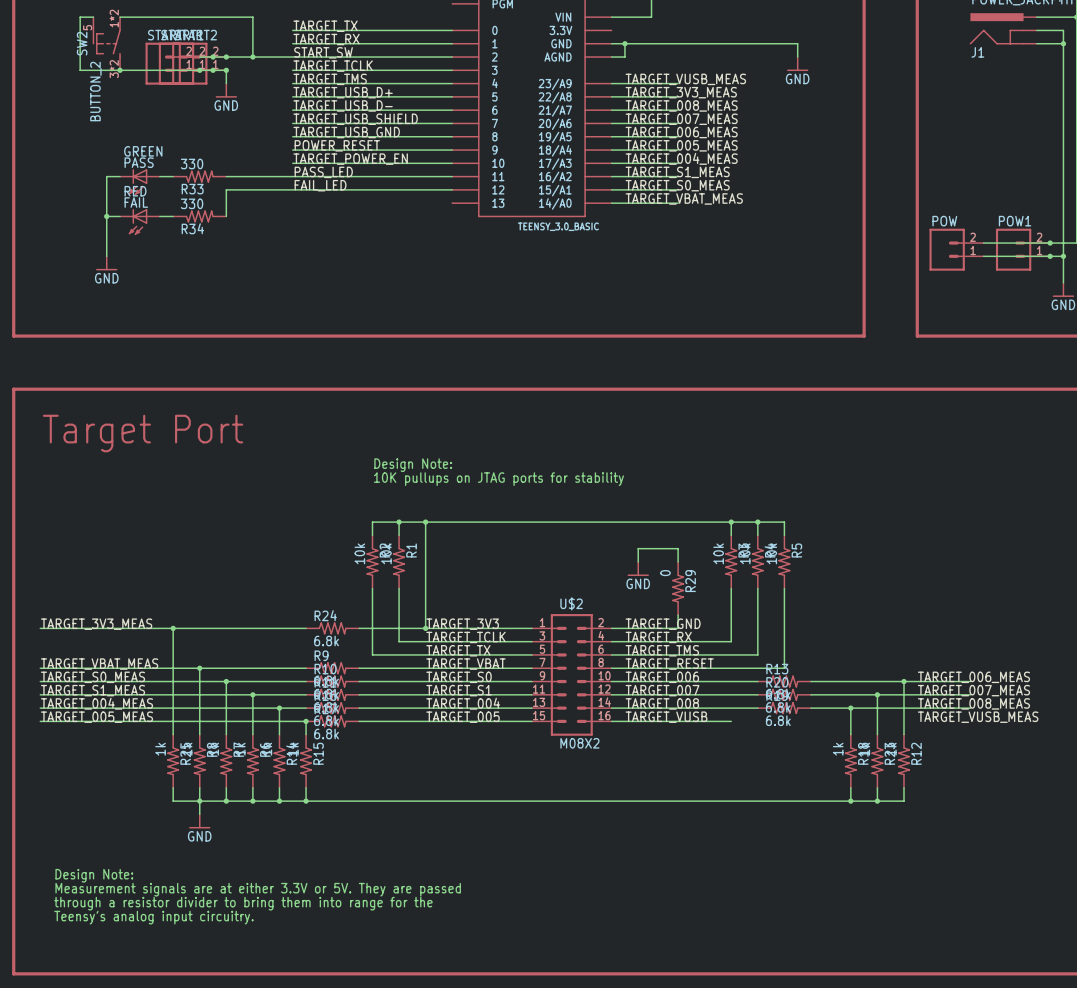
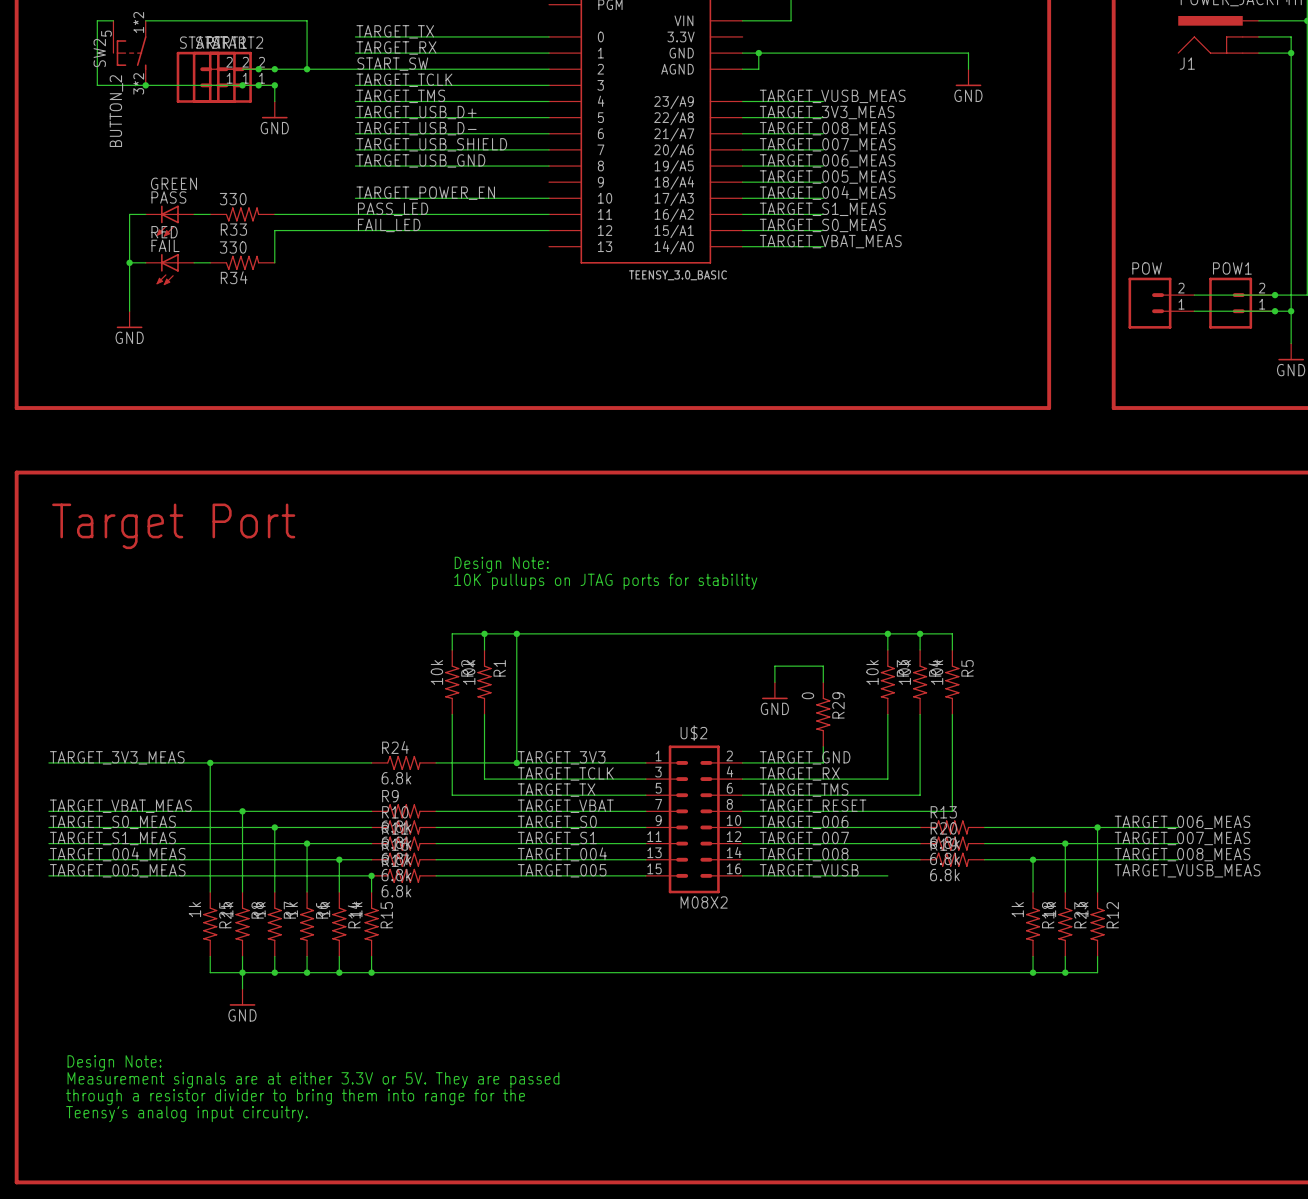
label: POWER_RESET (337, 145) -> none
wire: (292, 150) (452, 150) -> none

